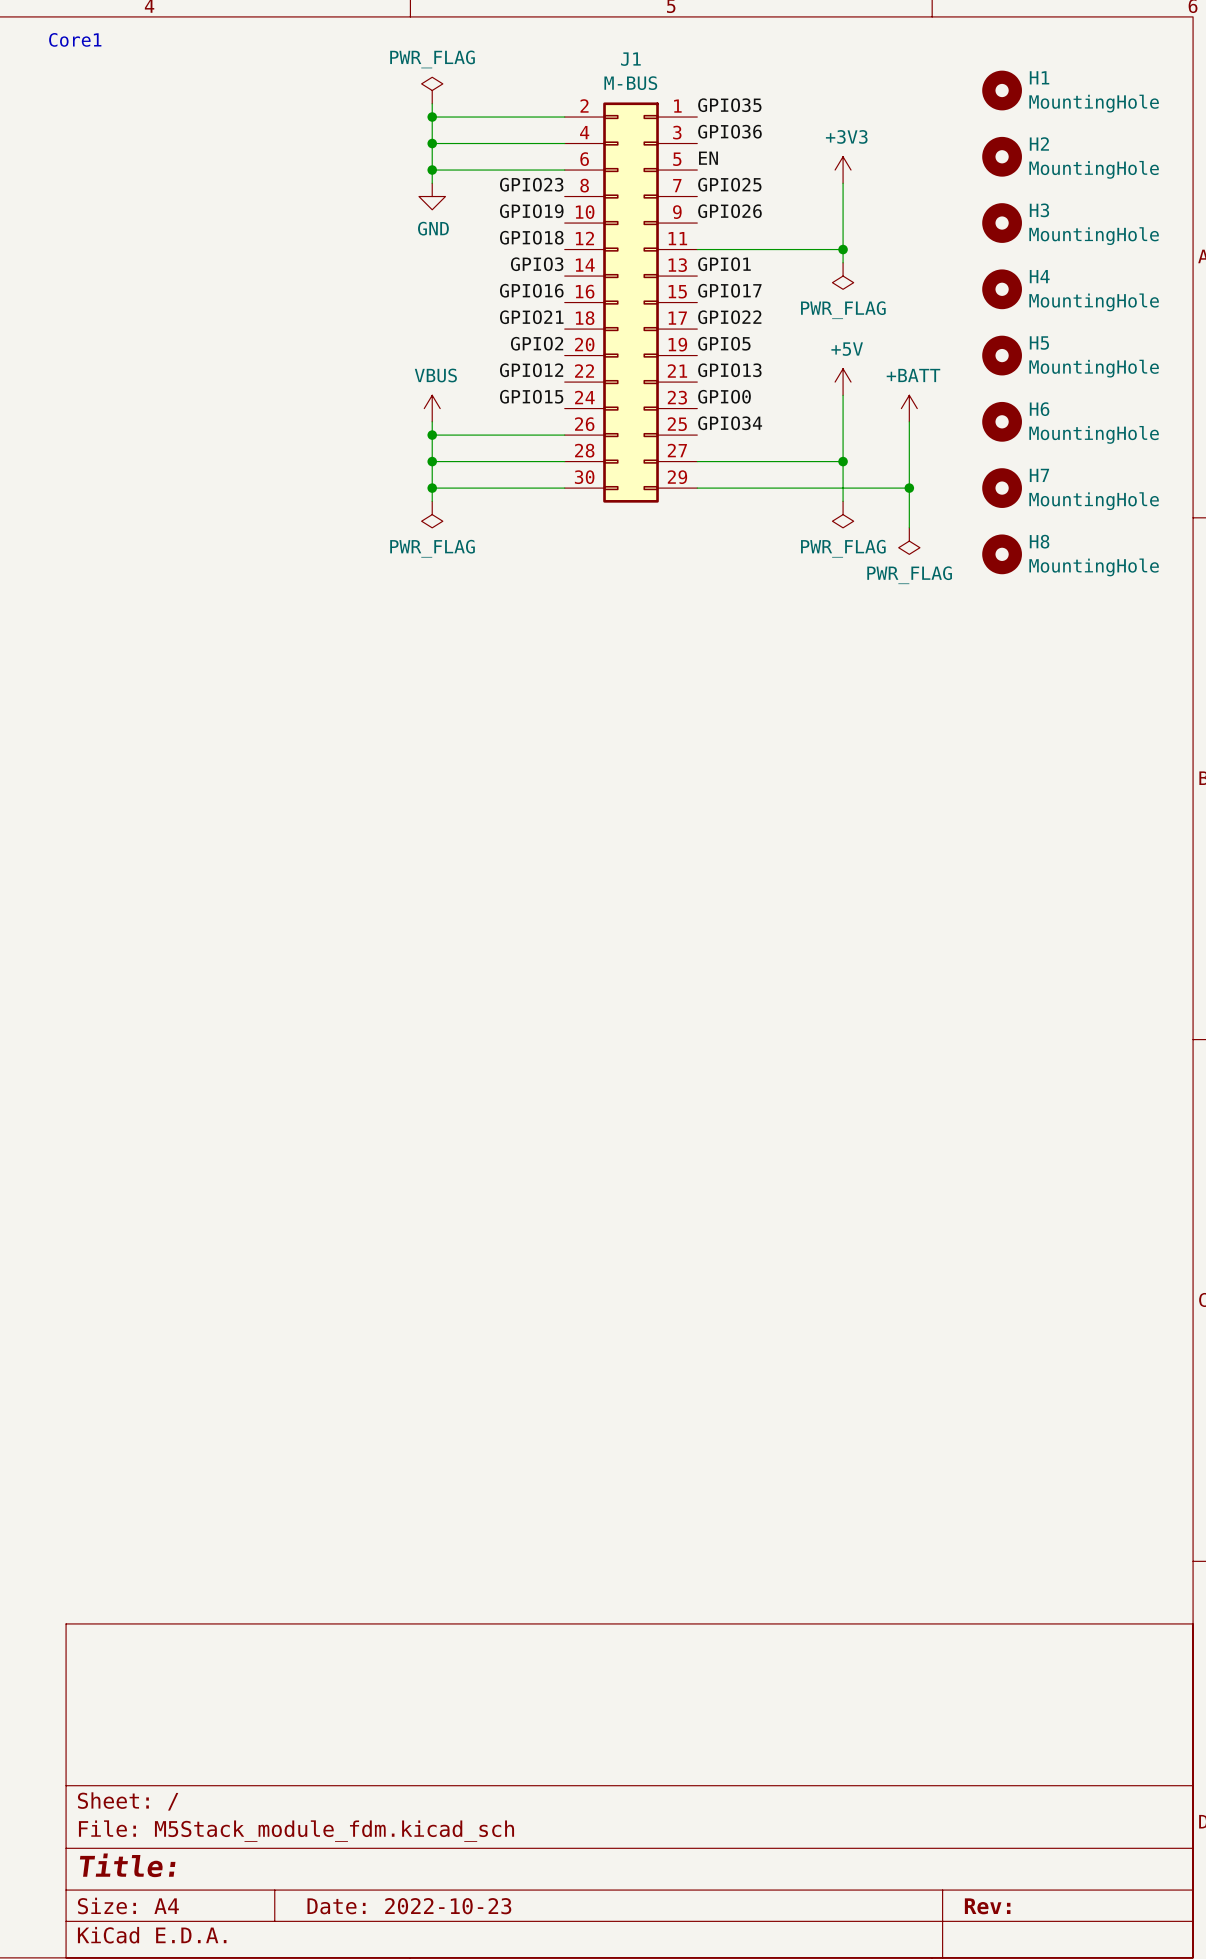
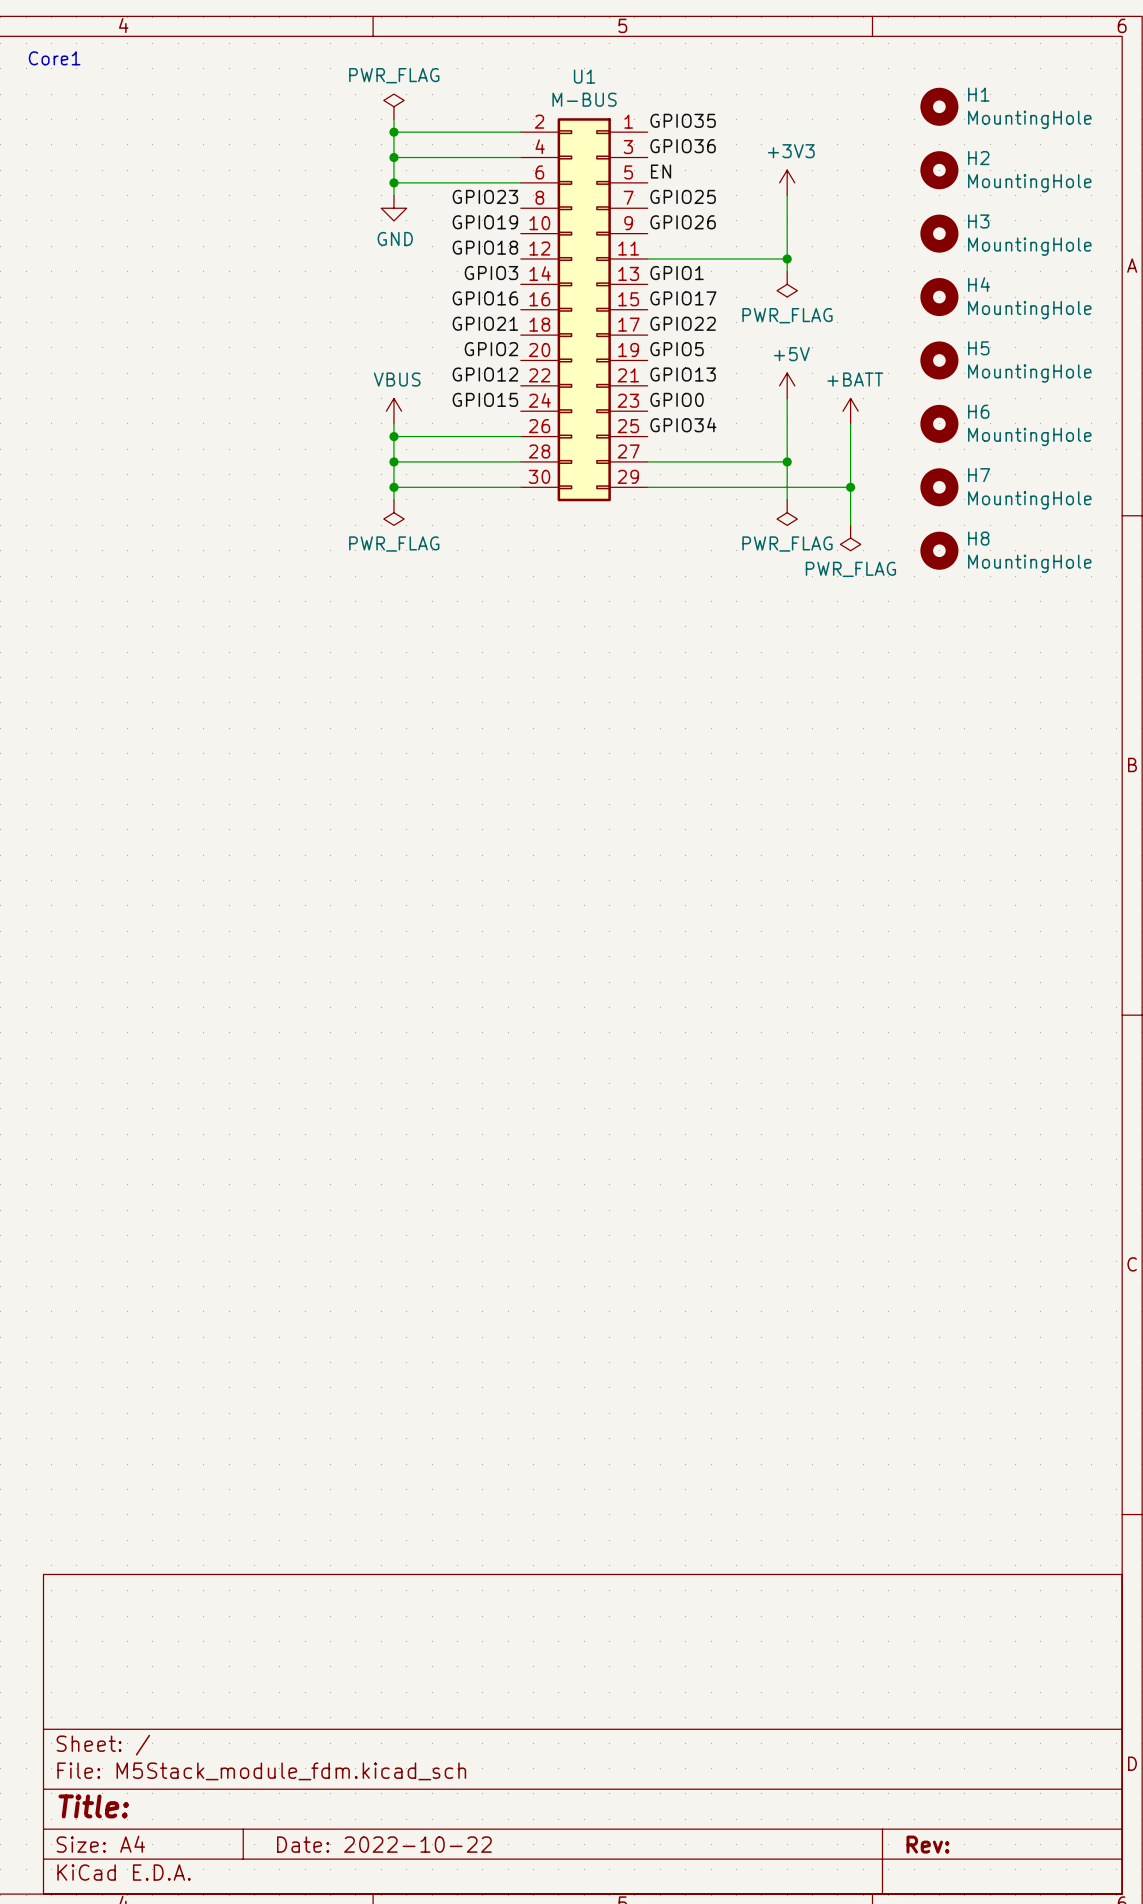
J1 name: J1 (630, 59) -> U1 (584, 76)
title block: Date: 2022-10-23 (409, 1906) -> Date: 2022-10-22 (384, 1844)

